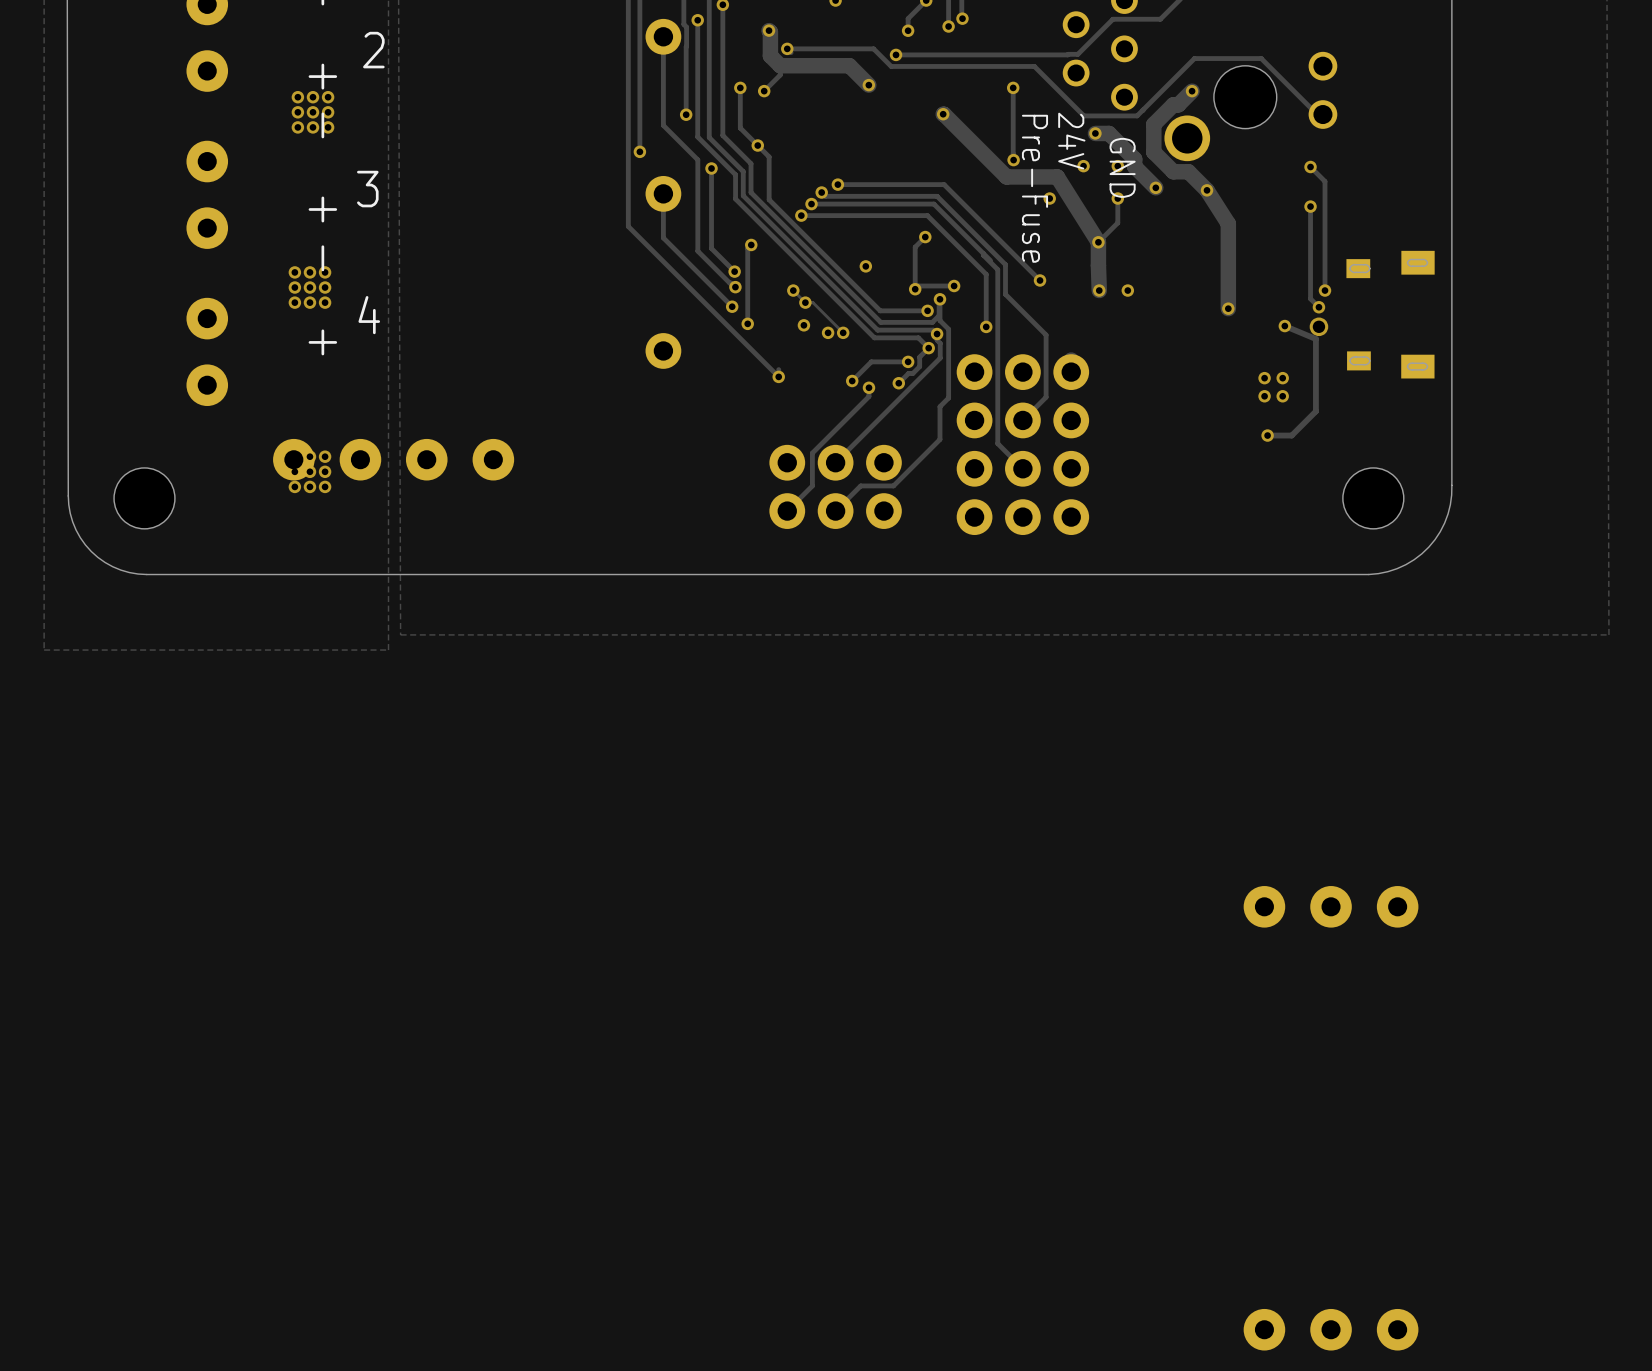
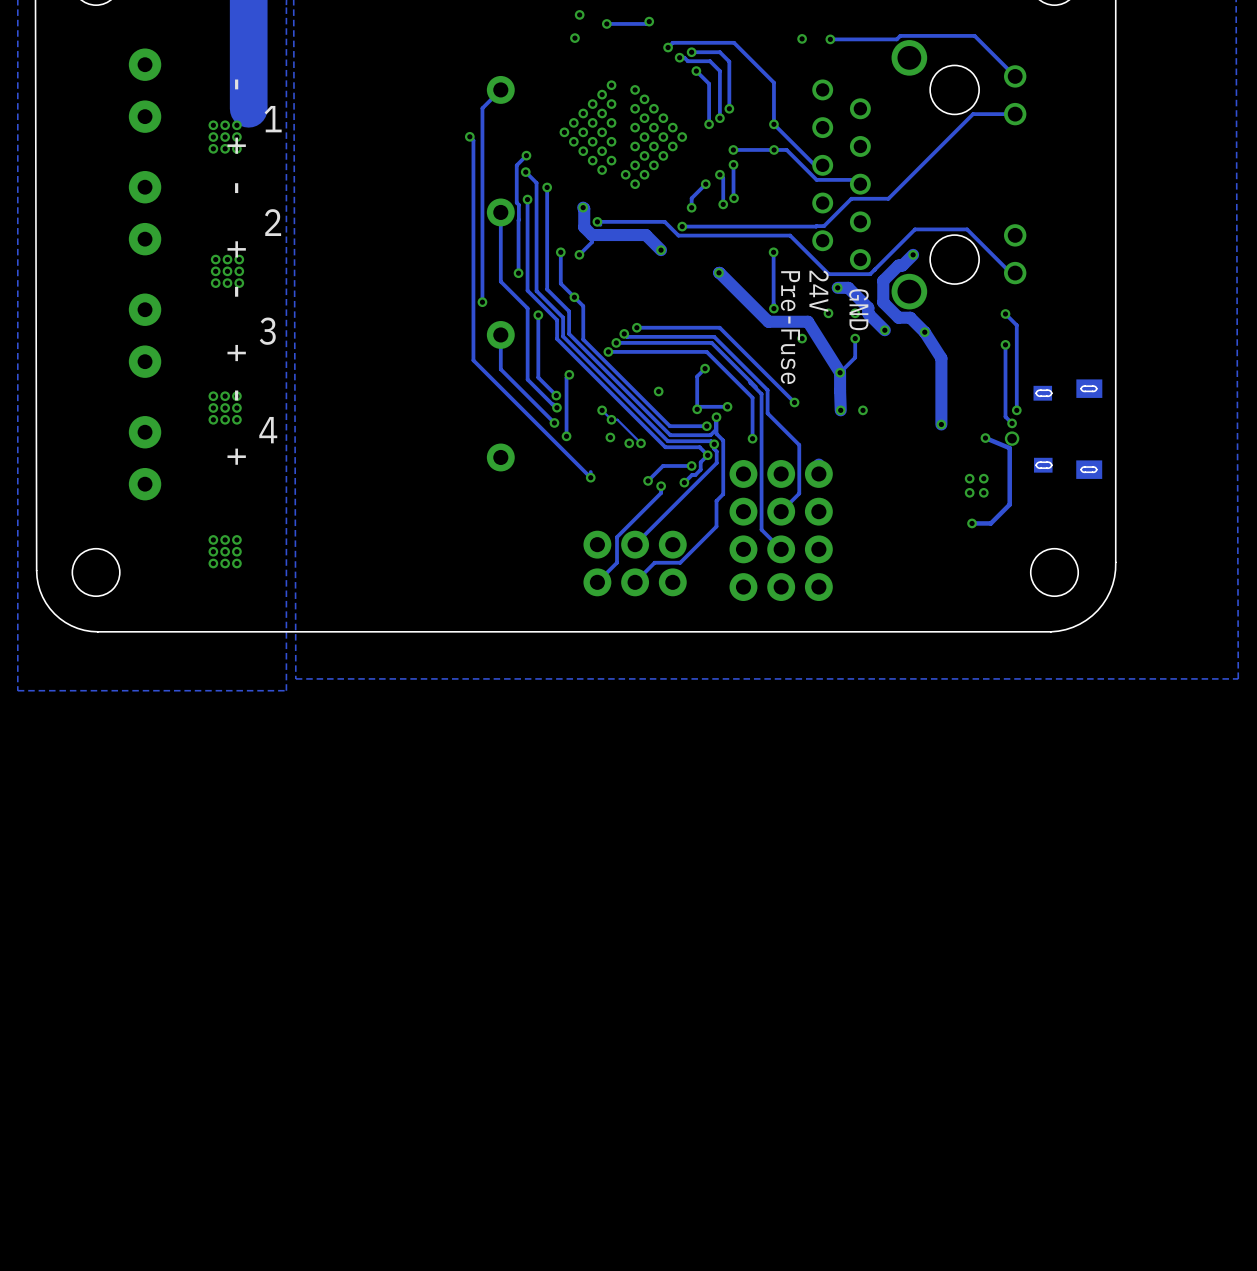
part: (327, 459) -> none
part: (460, 459) -> none
part: (1331, 906) -> none
part: (1331, 1329) -> none

